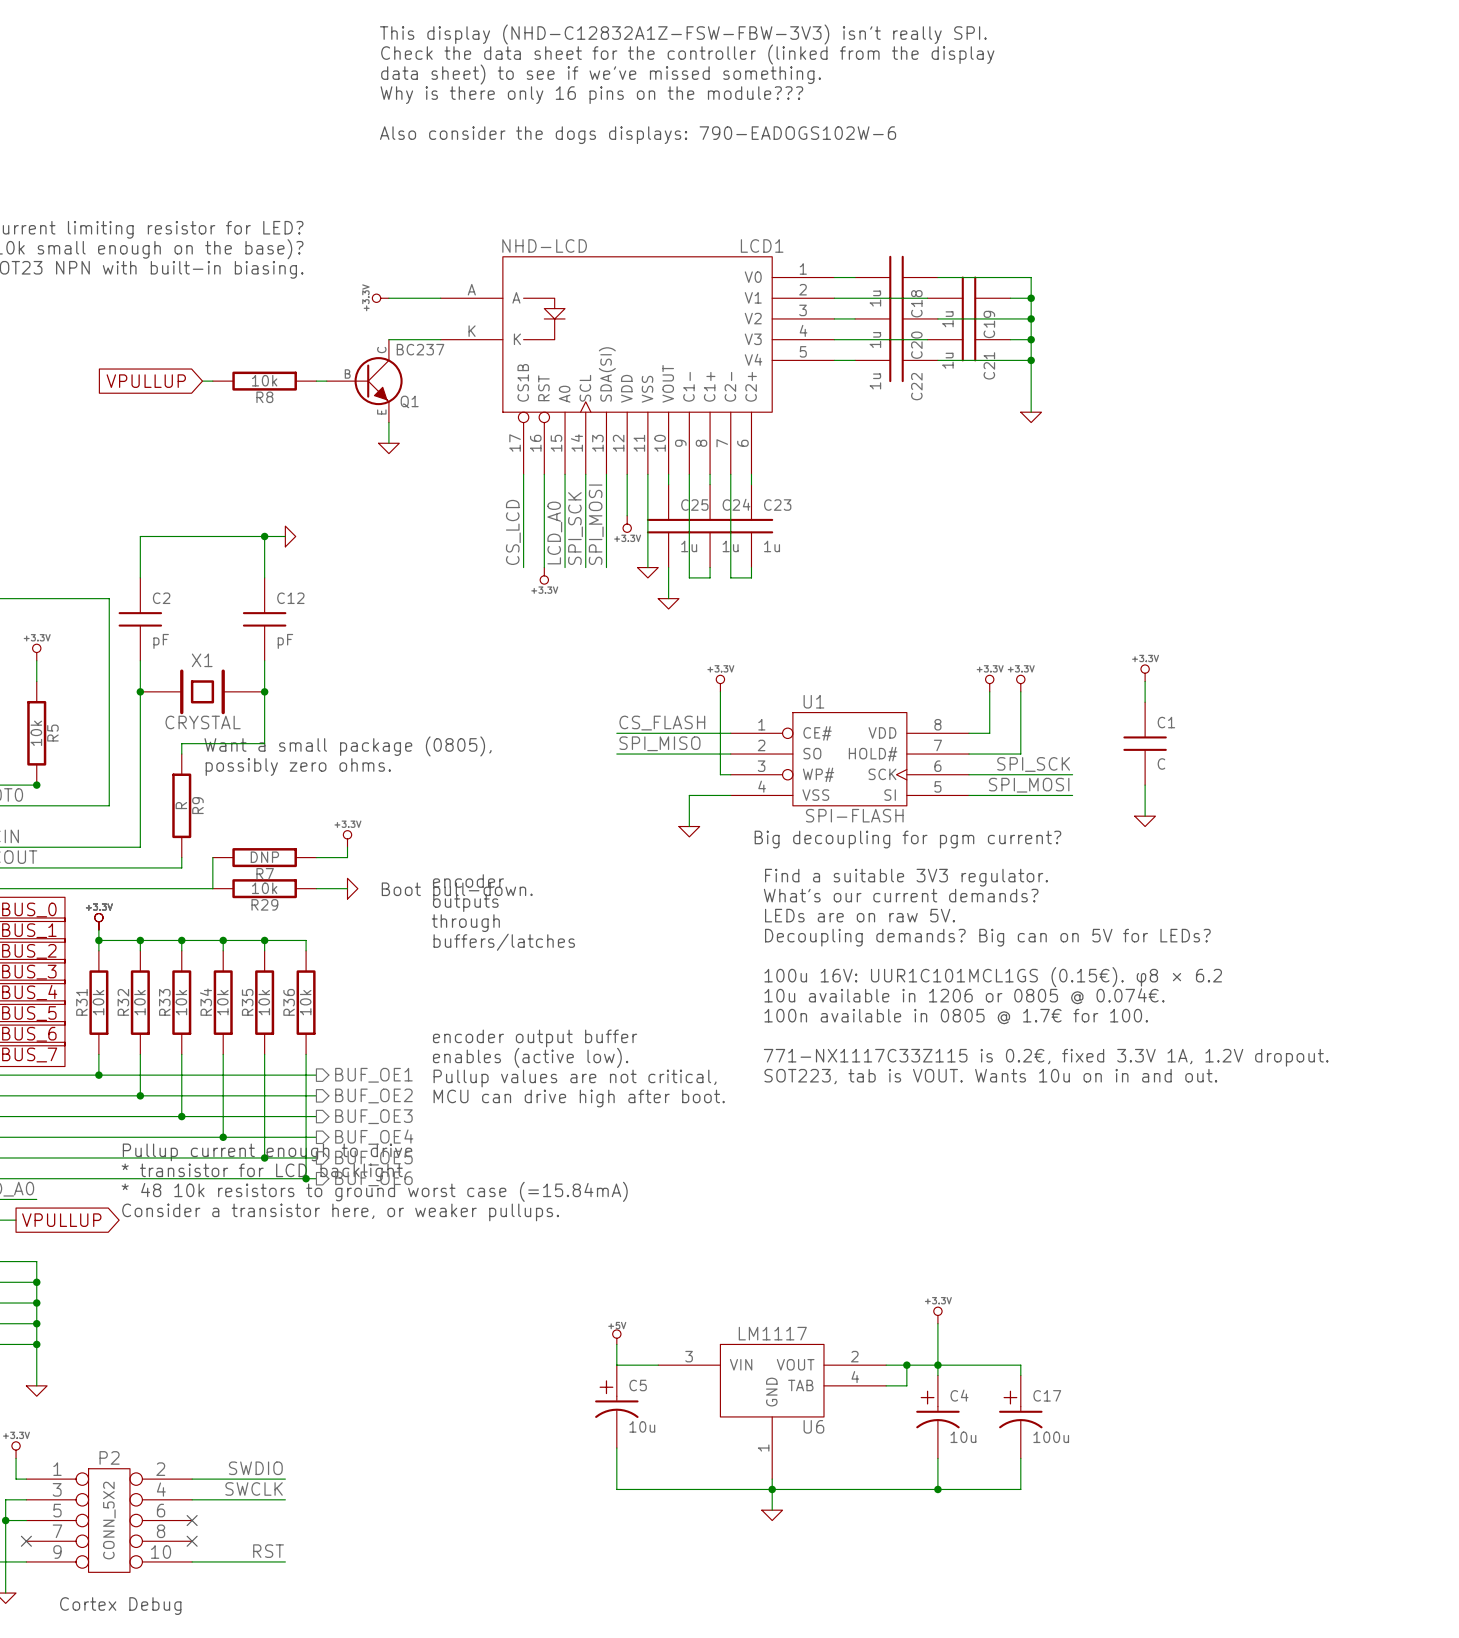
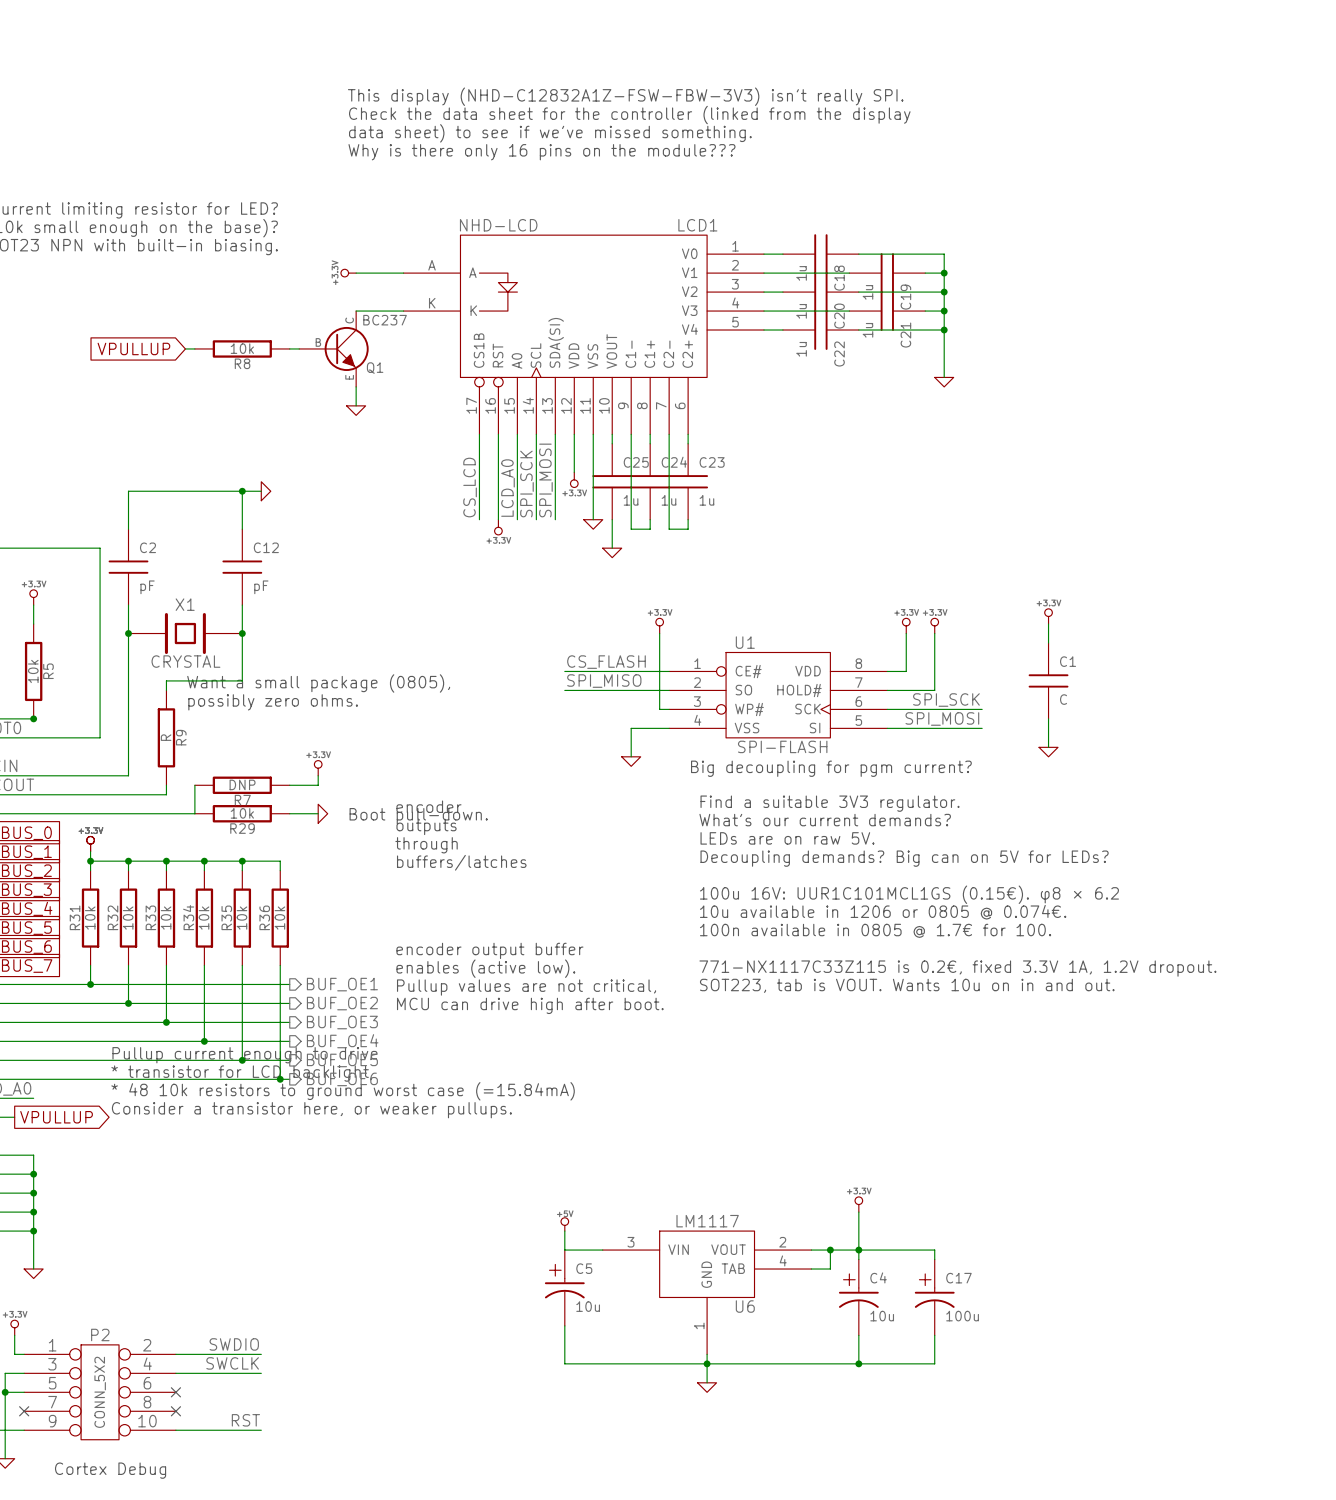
text position: This display (NHD-C12832A1Z-FSW-FBW-3V3) isn't really SPI. (683, 34) -> This display (NHD-C12832A1Z-FSW-FBW-3V3) isn't really SPI. (625, 96)
text position: Check the data sheet for the controller (linked from the display (687, 54) -> Check the data sheet for the controller (linked from the display (629, 115)
text position: data sheet) to see if we've missed something. (601, 74) -> data sheet) to see if we've missed something. (550, 133)
text position: Why is there only 16 pins on the module??? (591, 95) -> Why is there only 16 pins on the module??? (541, 152)
text: Also consider the dogs displays: 790-EADOGS102W-6 (638, 135) -> none

